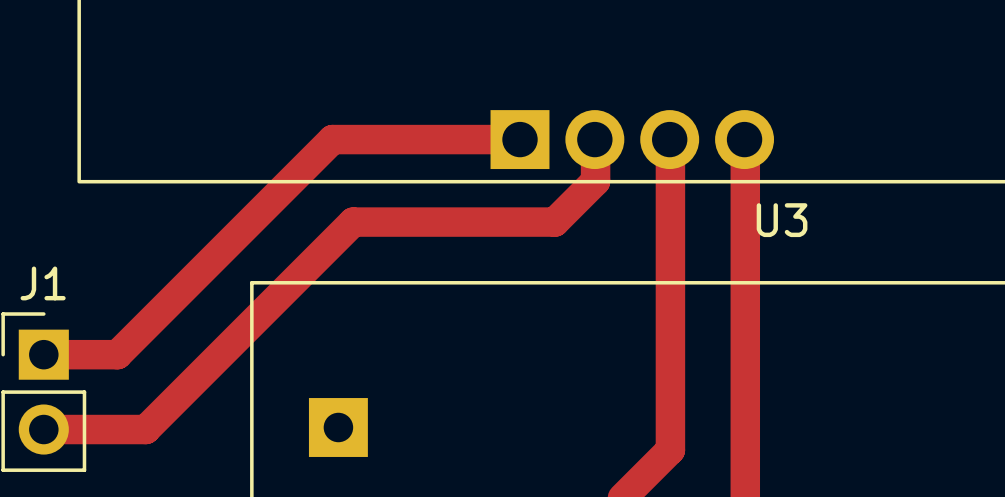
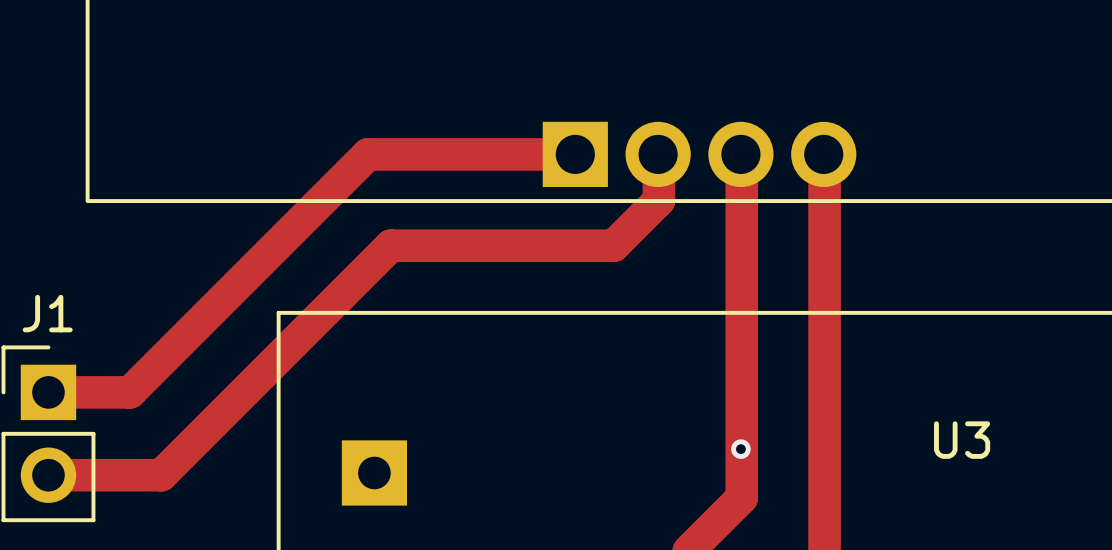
U3 name position: U3 (782, 220) -> U3 (962, 440)
via: none -> (740, 449)

